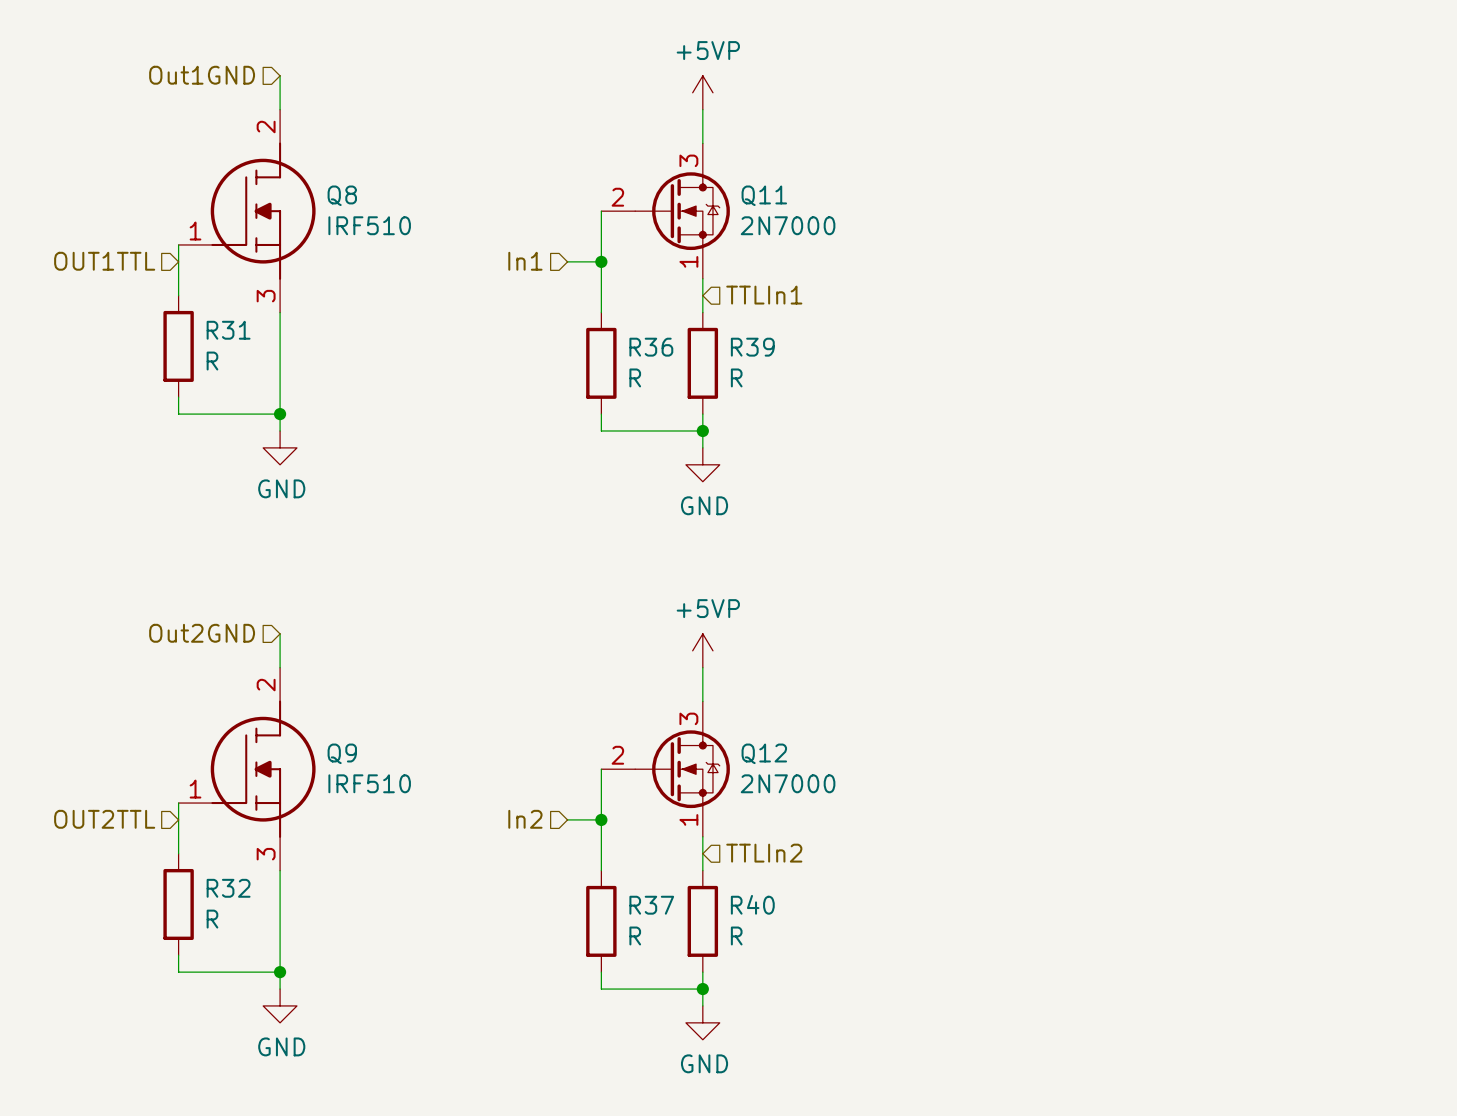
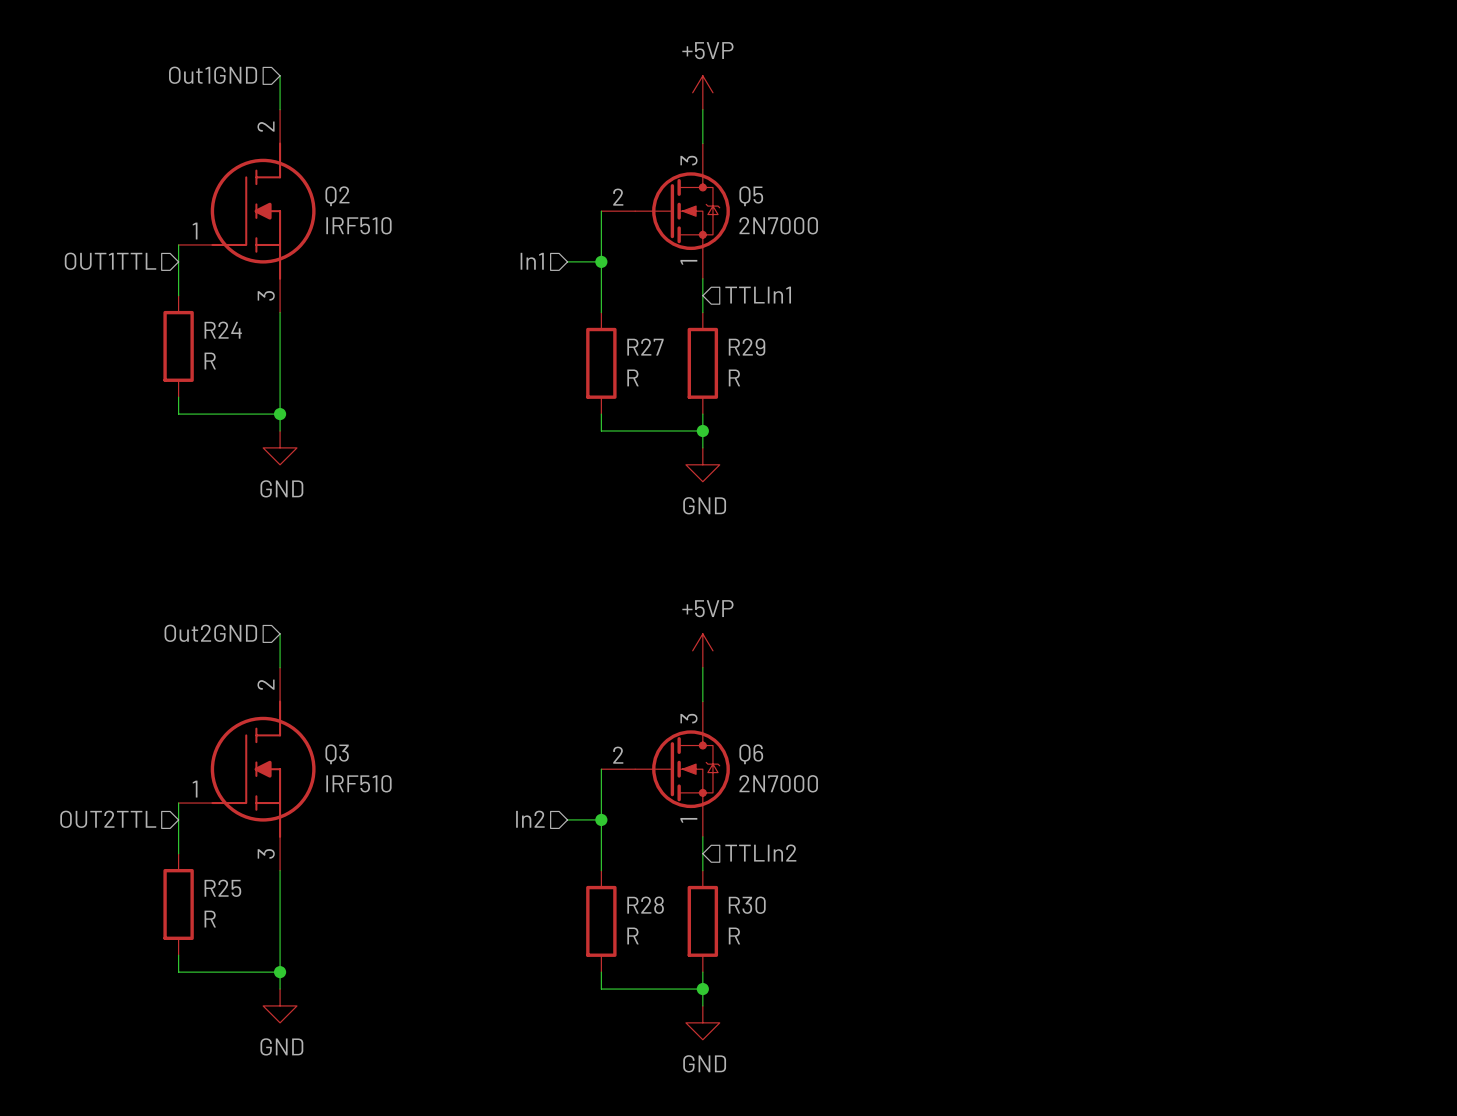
Q8 name: Q8 (342, 195) -> Q2 (337, 196)
Q11 name: Q11 (764, 195) -> Q5 (751, 196)
R31 name: R31 (228, 330) -> R24 (223, 330)
R36 name: R36 (651, 347) -> R27 (645, 347)
R39 name: R39 (752, 347) -> R29 (747, 347)
Q9 name: Q9 (342, 753) -> Q3 (337, 754)
Q12 name: Q12 (764, 753) -> Q6 (751, 754)
R32 name: R32 (228, 888) -> R25 (222, 888)
R40 name: R40 (752, 904) -> R30 (747, 905)
R37 name: R37 (651, 905) -> R28 (645, 905)

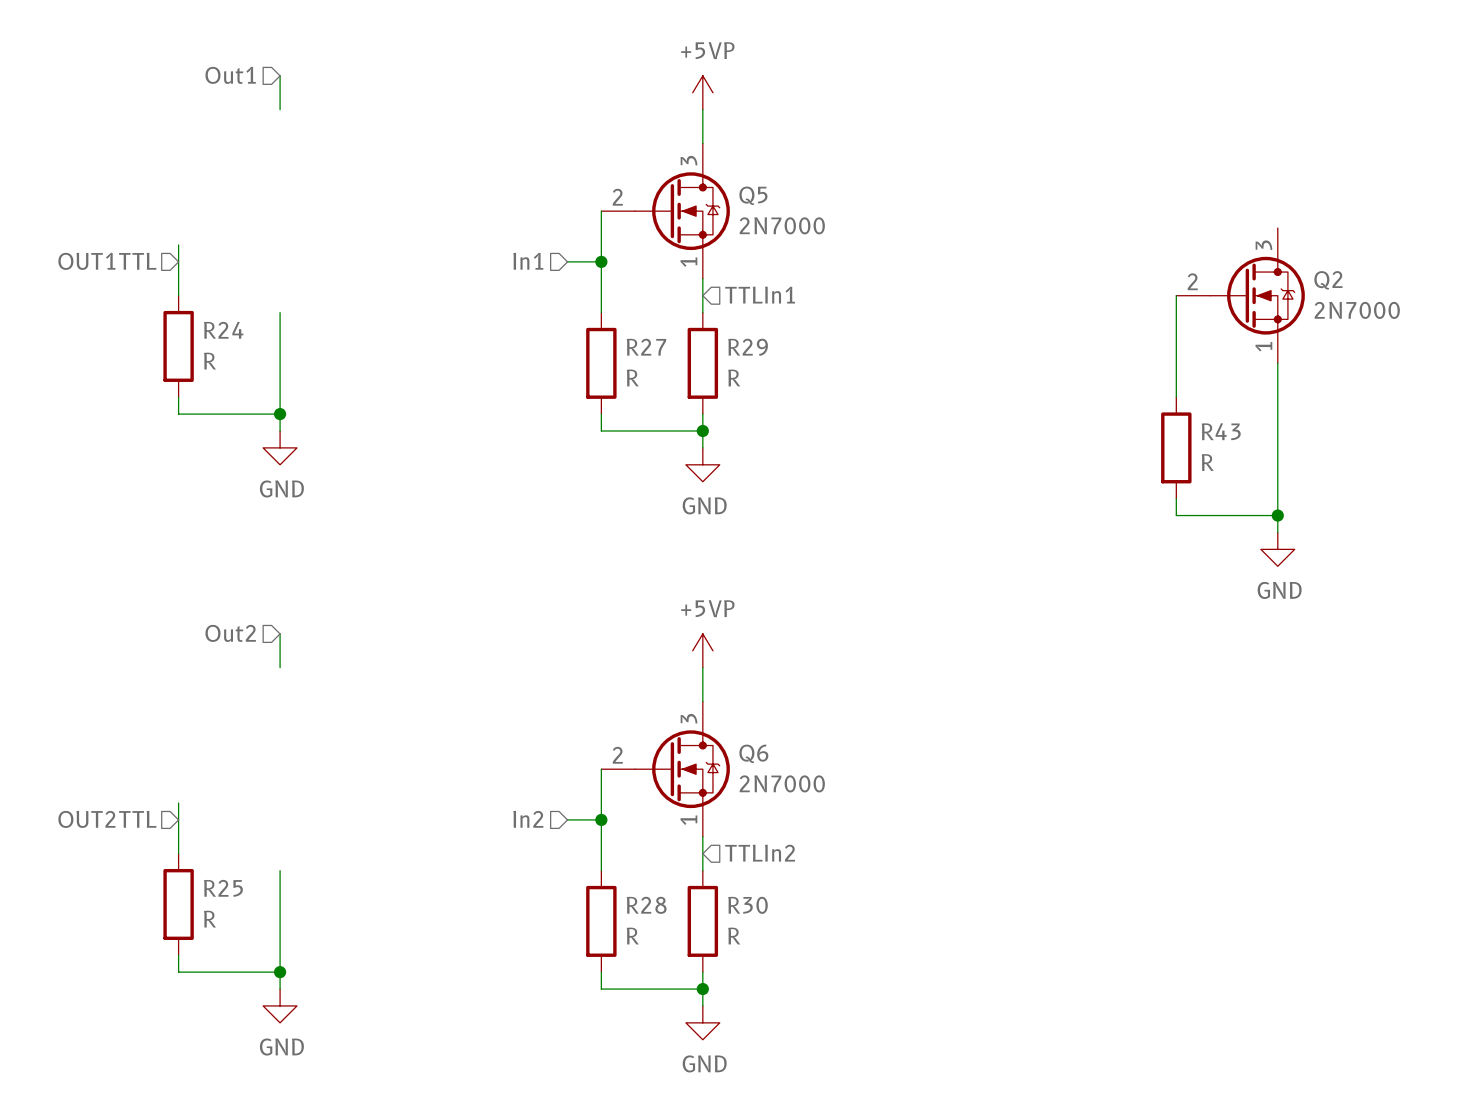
hierarchical label: Out1GND (213, 75) -> Out1 (230, 75)
Q2 symbol: [178, 109, 316, 313] -> [1176, 228, 1305, 364]
Q2 value: IRF510 (358, 225) -> 2N7000 (1357, 310)
wire: none -> (1176, 295) (1176, 397)
wire: none -> (1277, 363) (1277, 532)
R43: none -> R (1176, 447)
wire: none -> (1176, 498) (1176, 515) (1277, 515)
junction: none -> (1277, 515)
power symbol: none -> GND (1277, 549)
hierarchical label: Out2GND (210, 633) -> Out2 (230, 633)
Q3: IRF510 (247, 769) -> none

